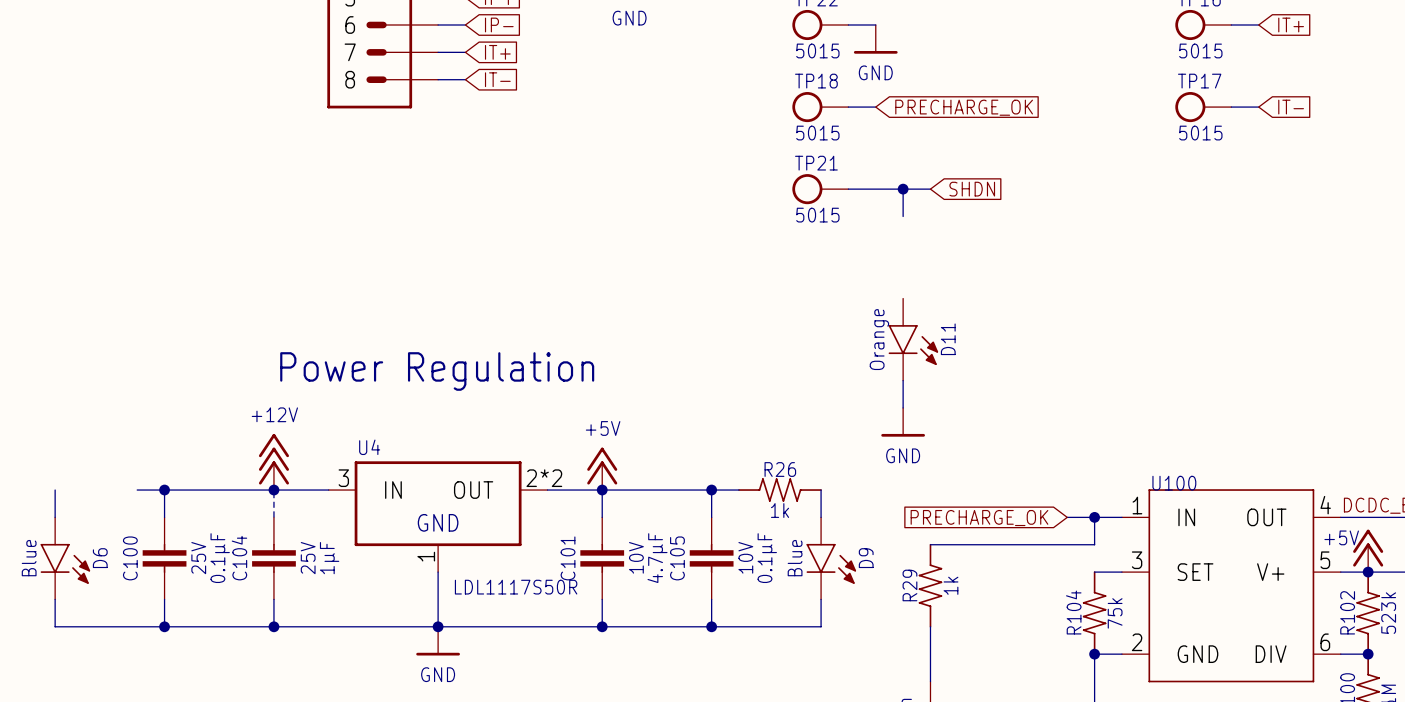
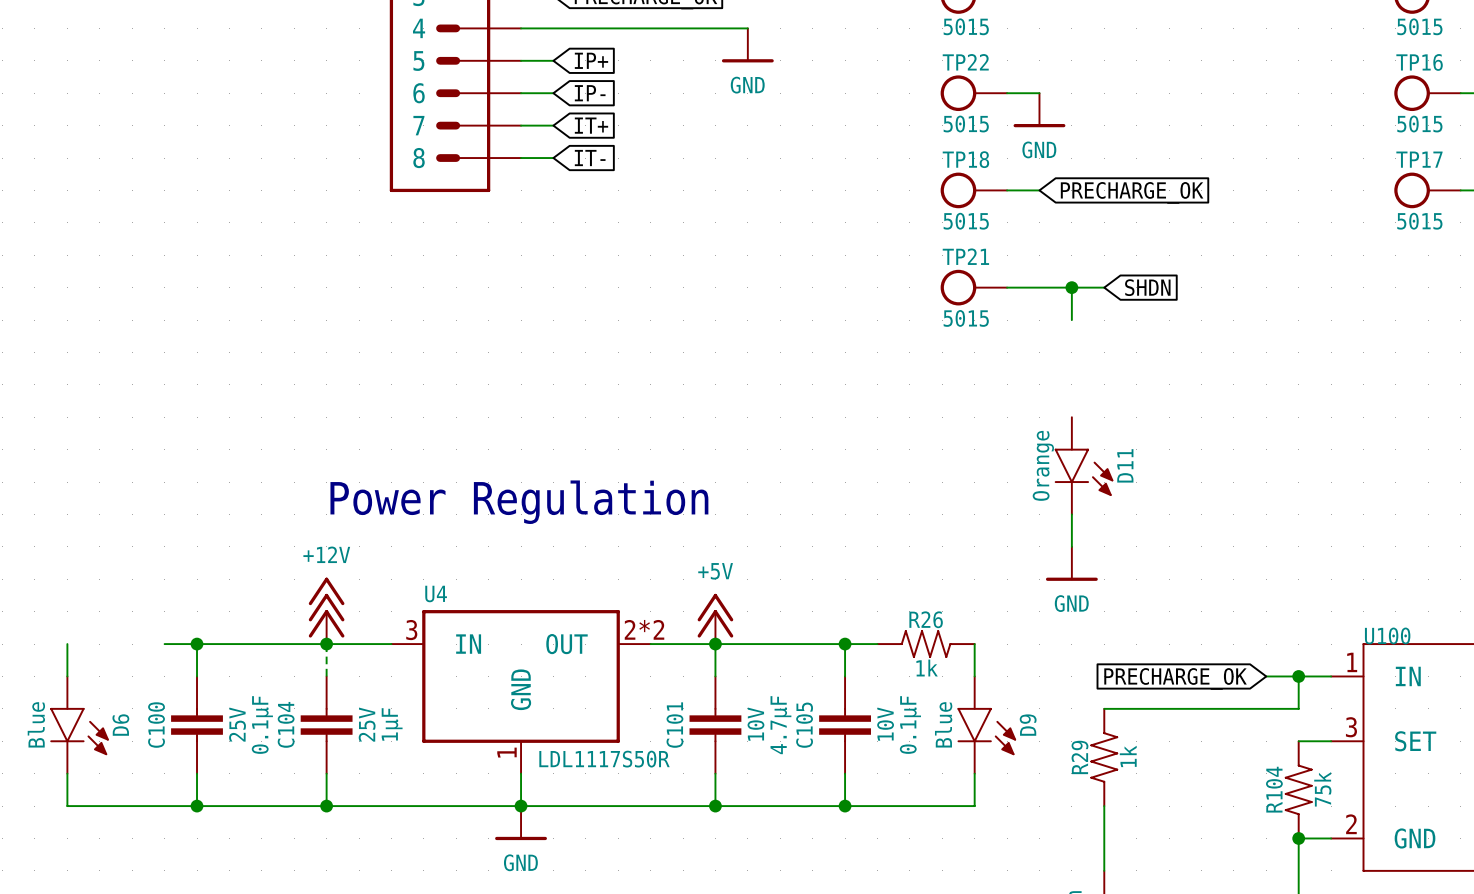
U4 symbol: [328, 461, 548, 573] -> [391, 610, 651, 774]

